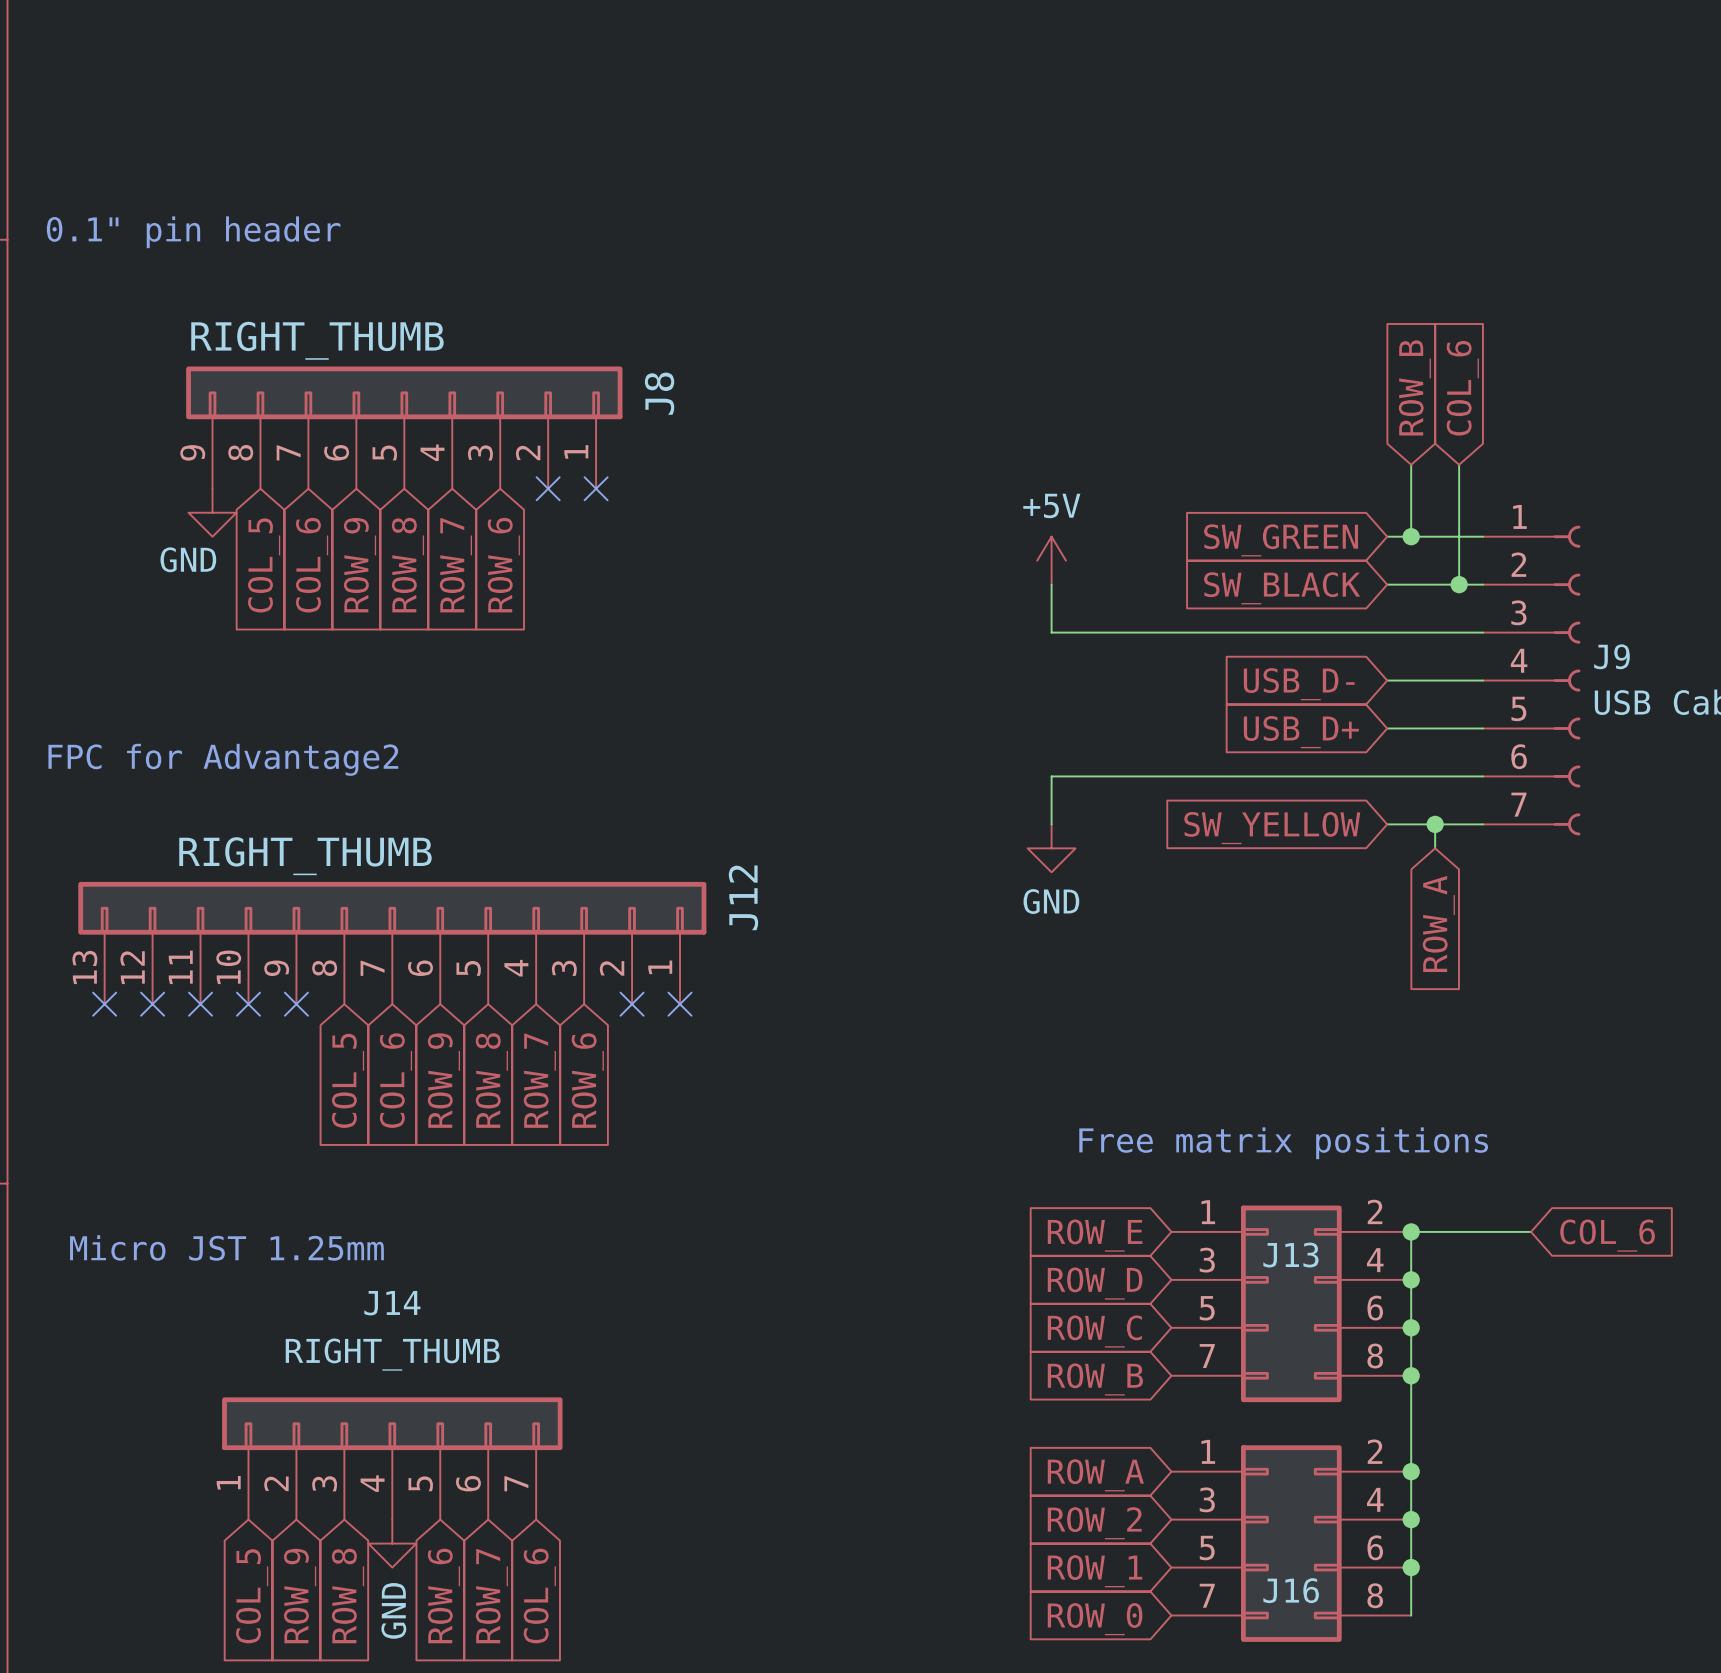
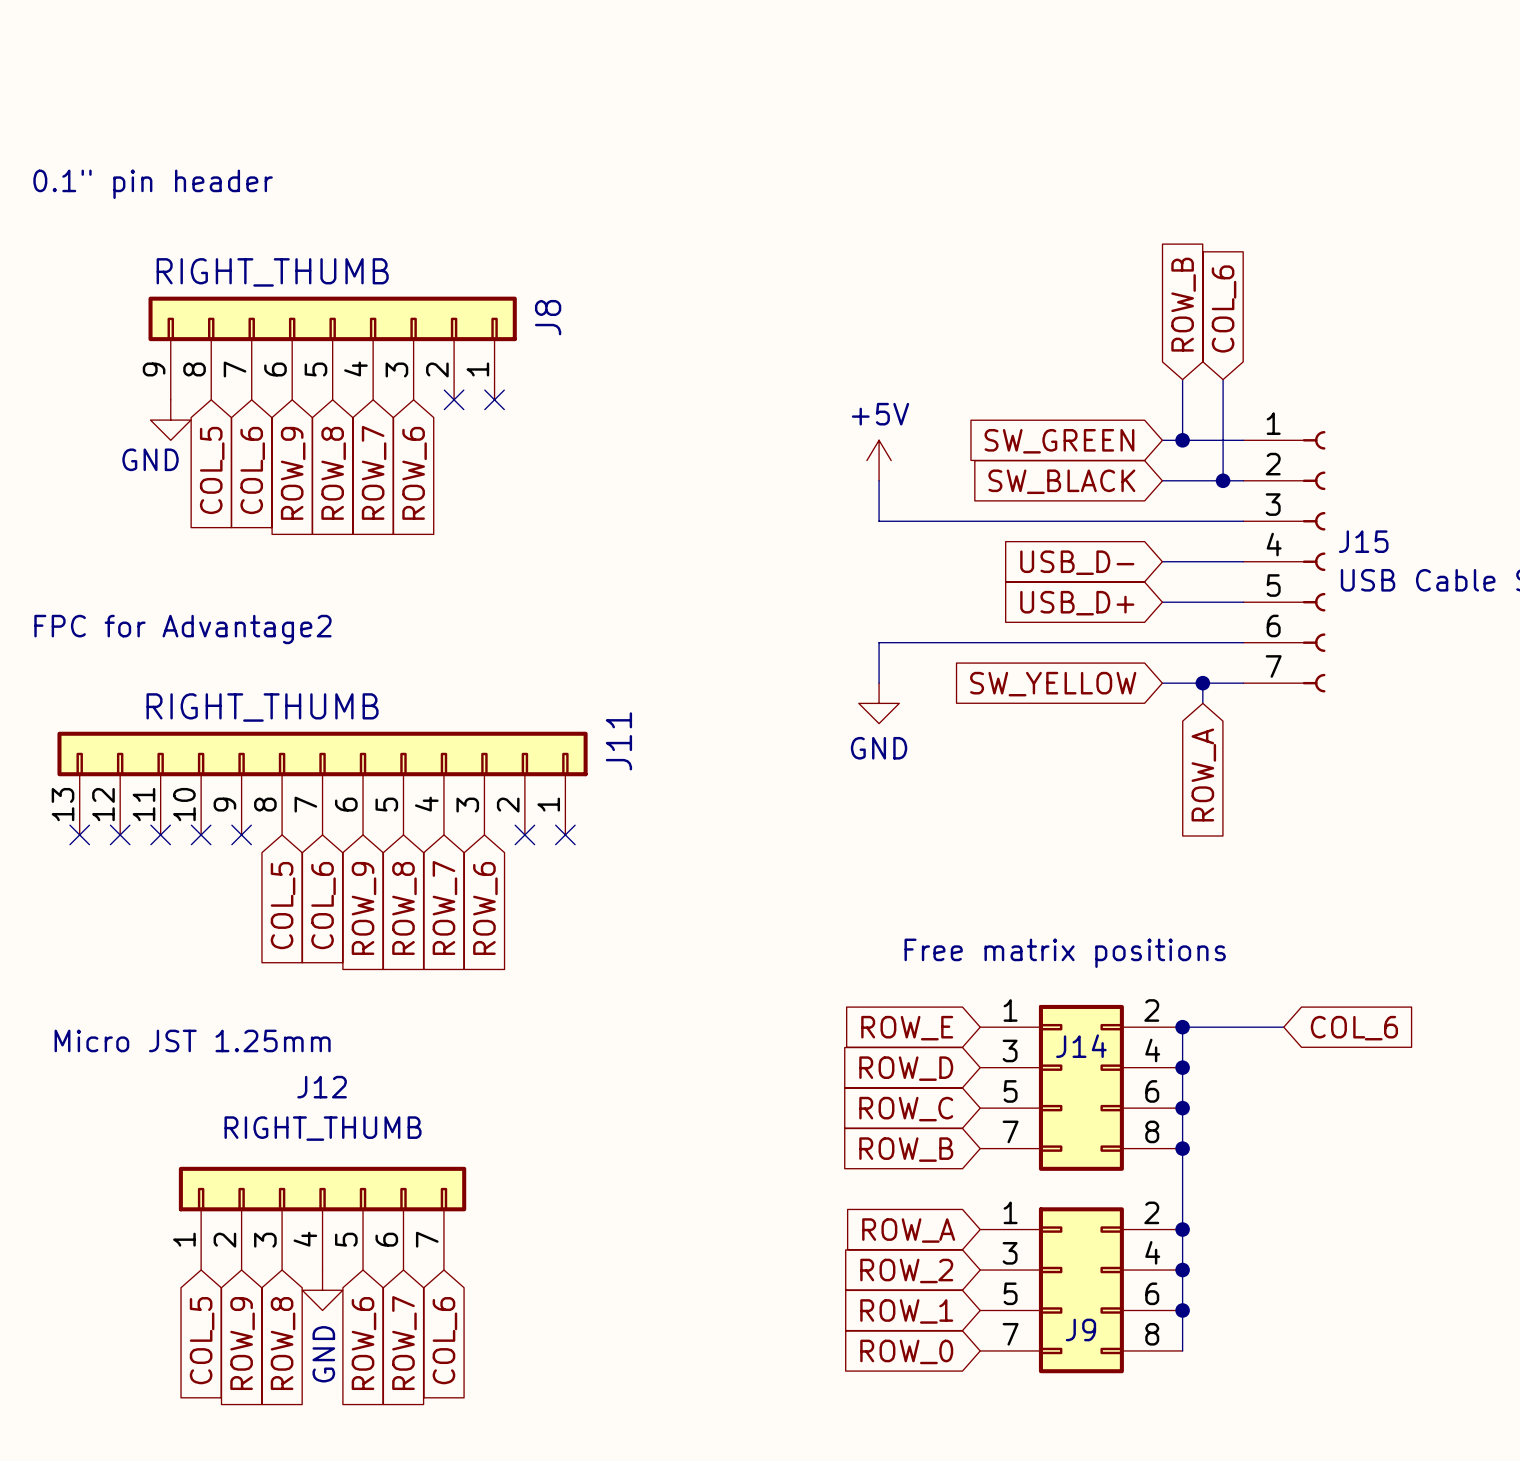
J9 name: J9 (1611, 656) -> J15 (1363, 541)
J12 name: J12 (743, 897) -> J11 (618, 741)
J13 name: J13 (1290, 1255) -> J14 (1081, 1046)
J14 name: J14 (392, 1303) -> J12 (322, 1087)
J16 name: J16 (1291, 1590) -> J9 (1080, 1329)

